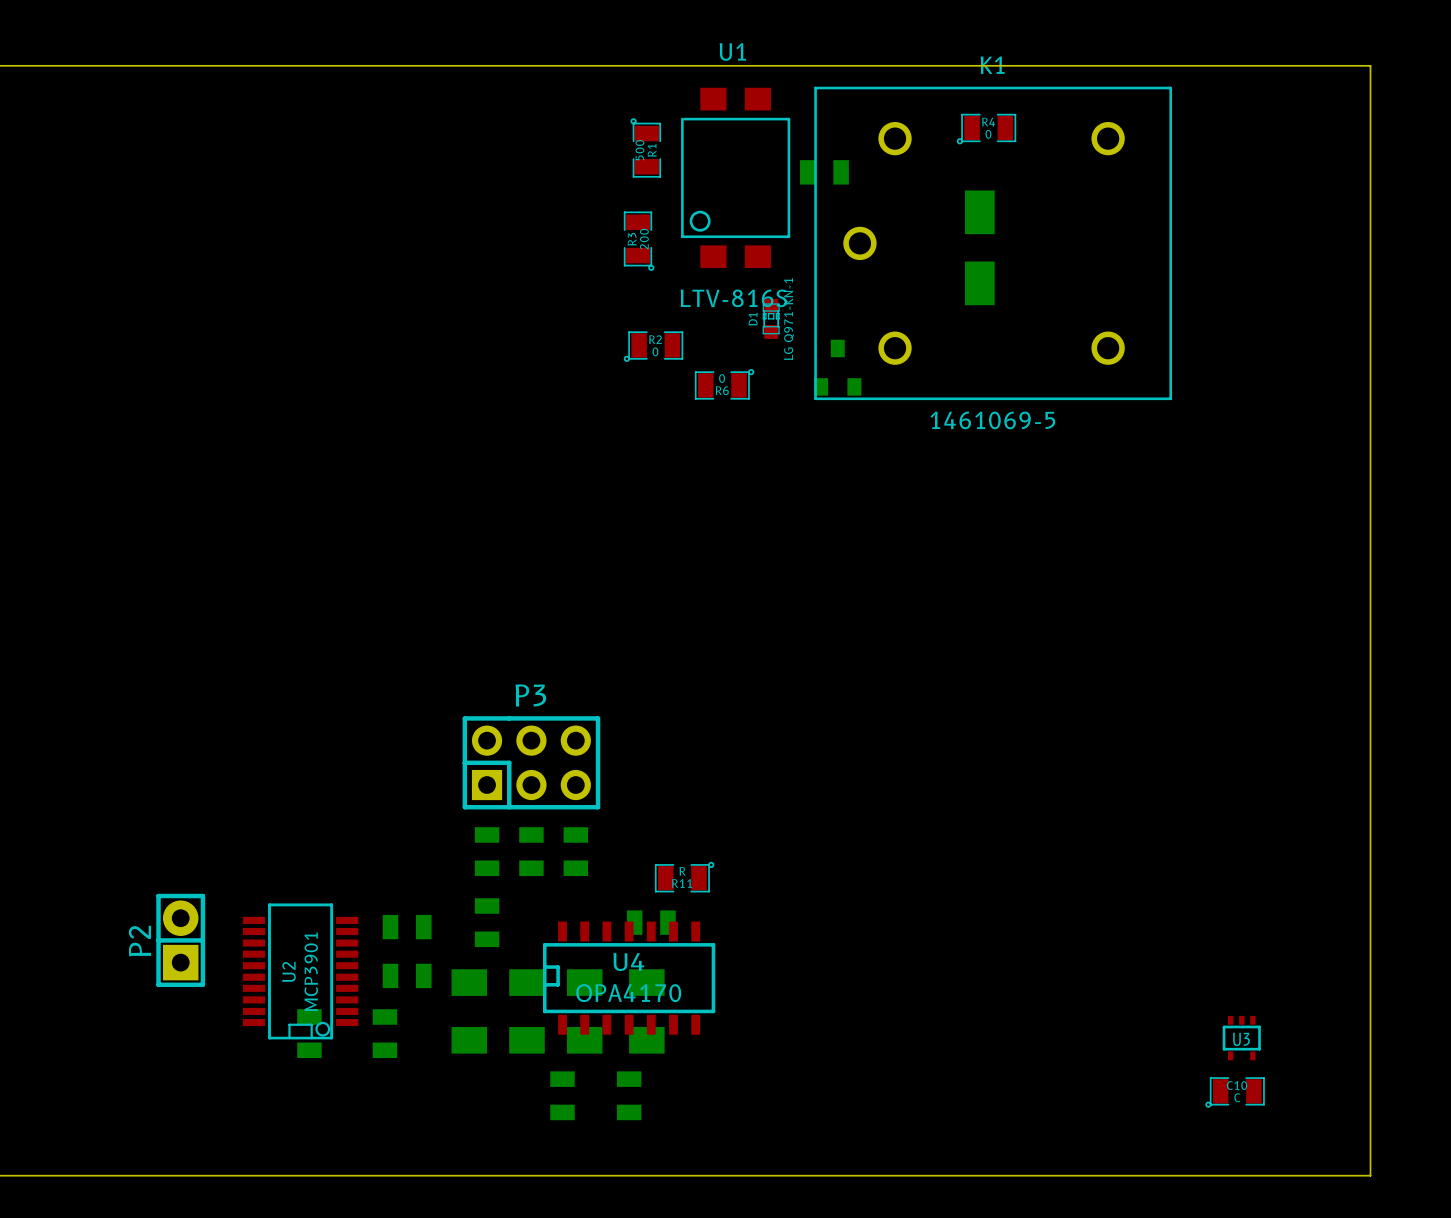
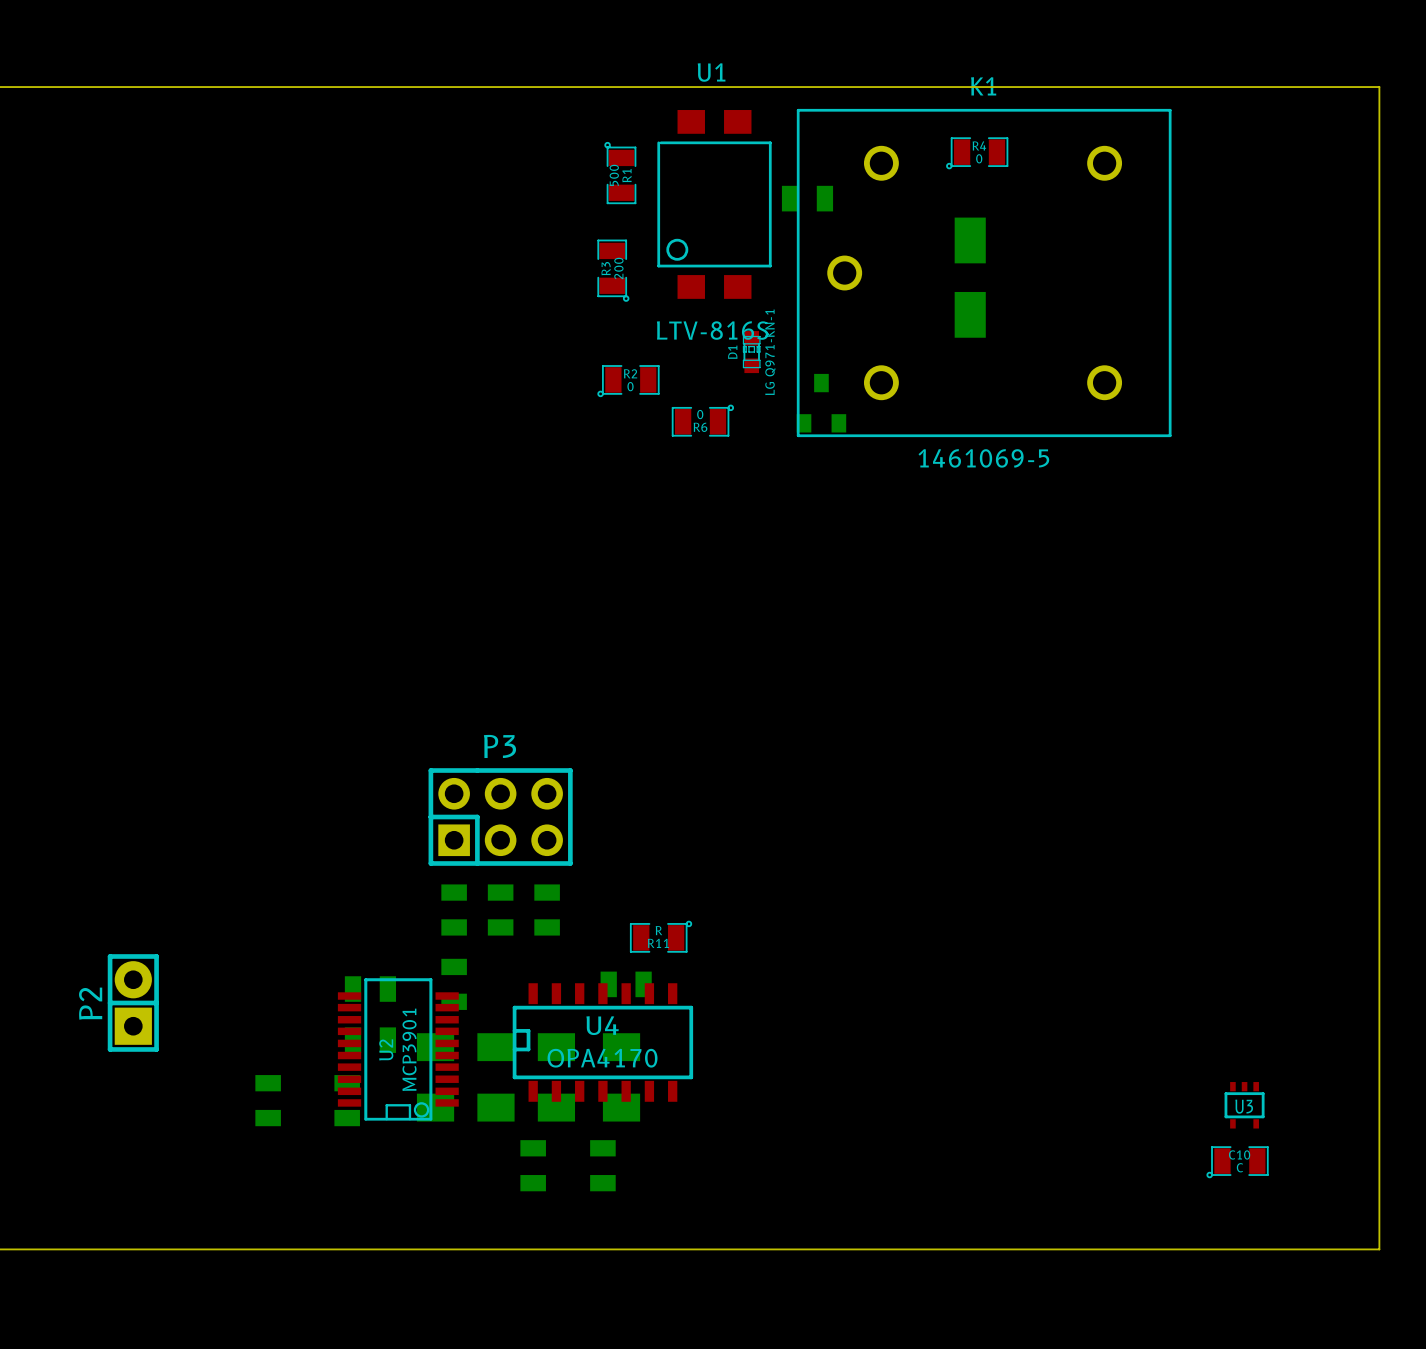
U2 position: (300, 971) -> (398, 1049)

